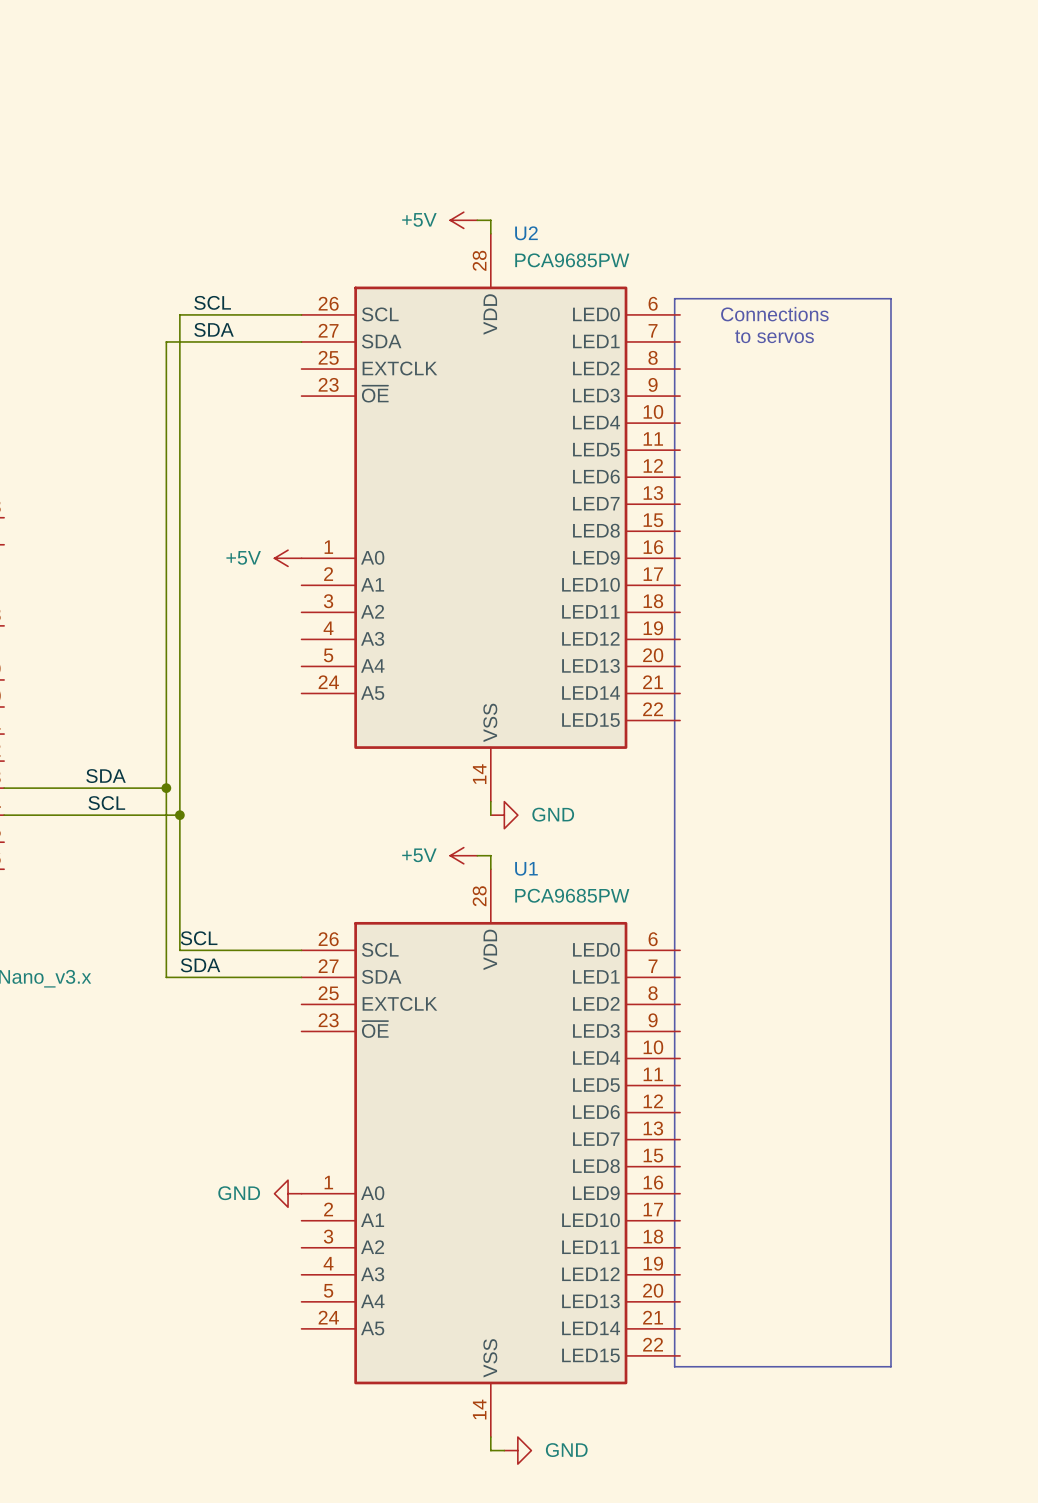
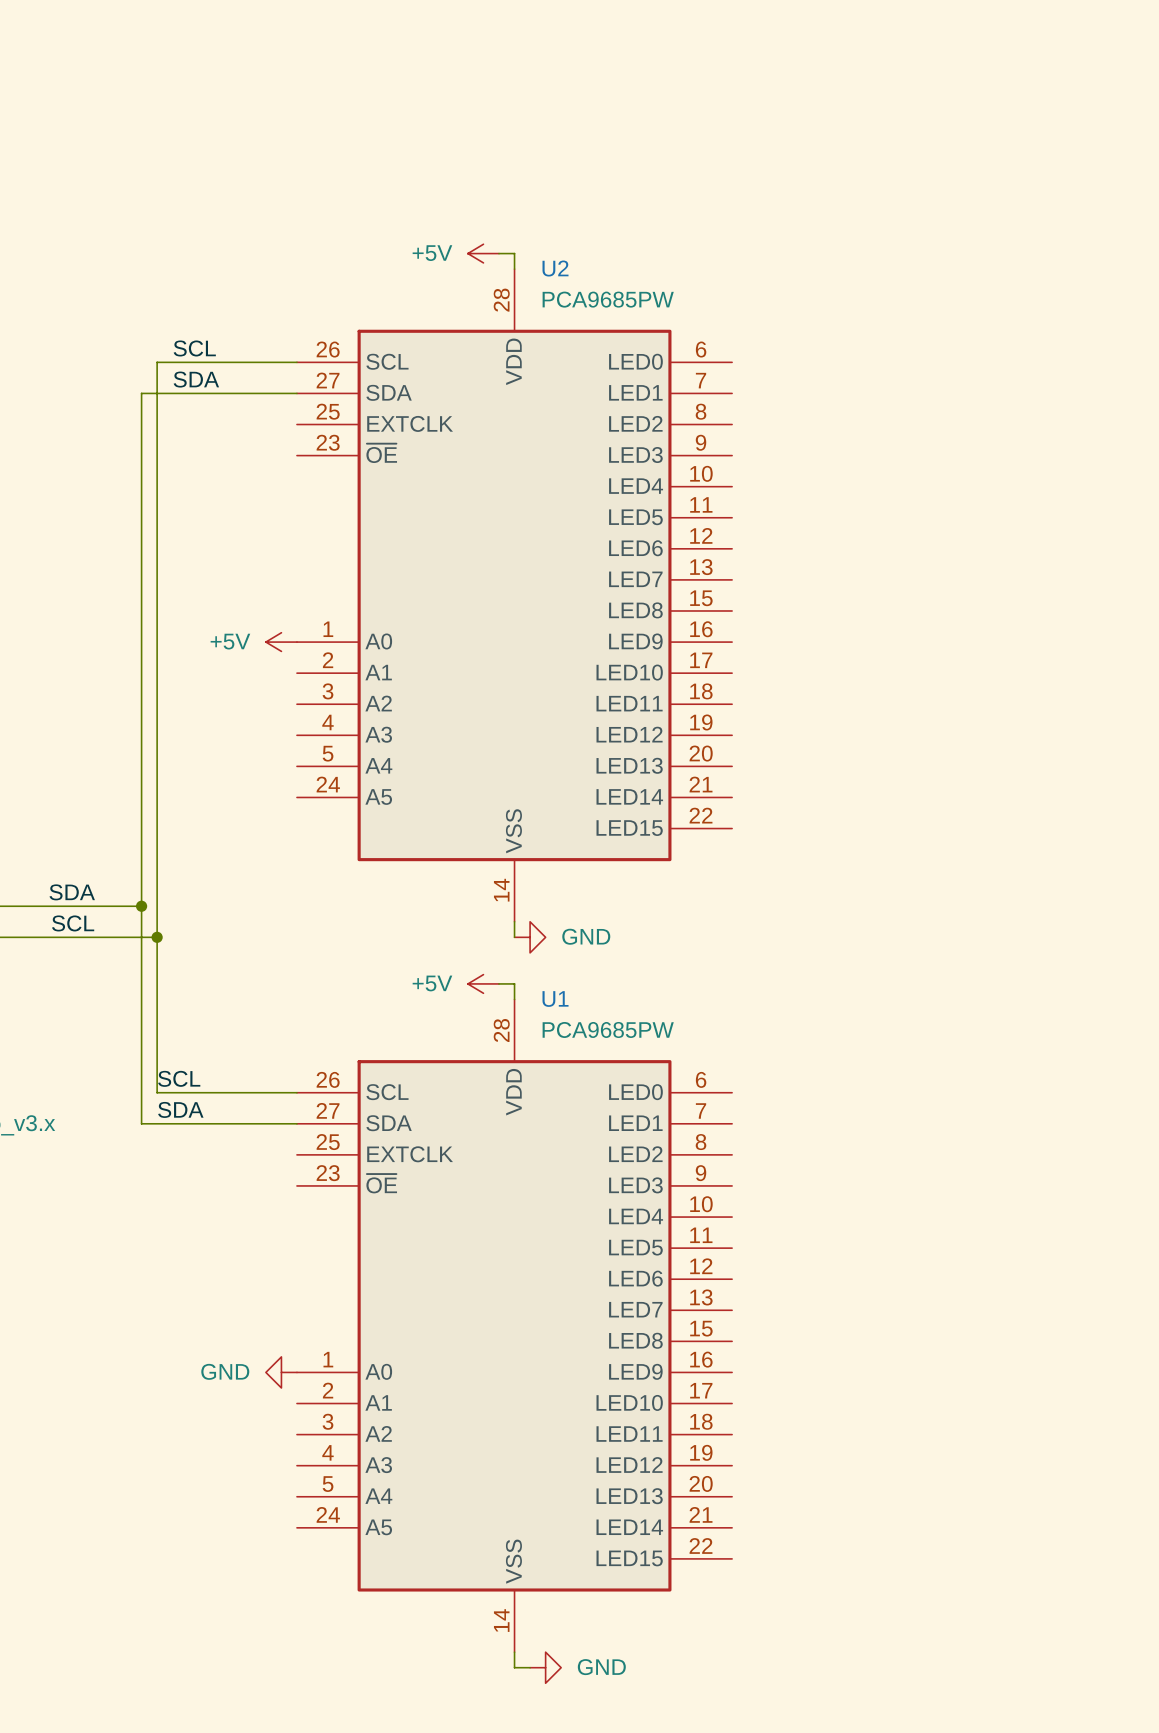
line: (674, 298) (890, 298) (890, 1366) (674, 1366) (674, 298) -> none
text: Connections (774, 314) -> none
text: to servos (774, 336) -> none

